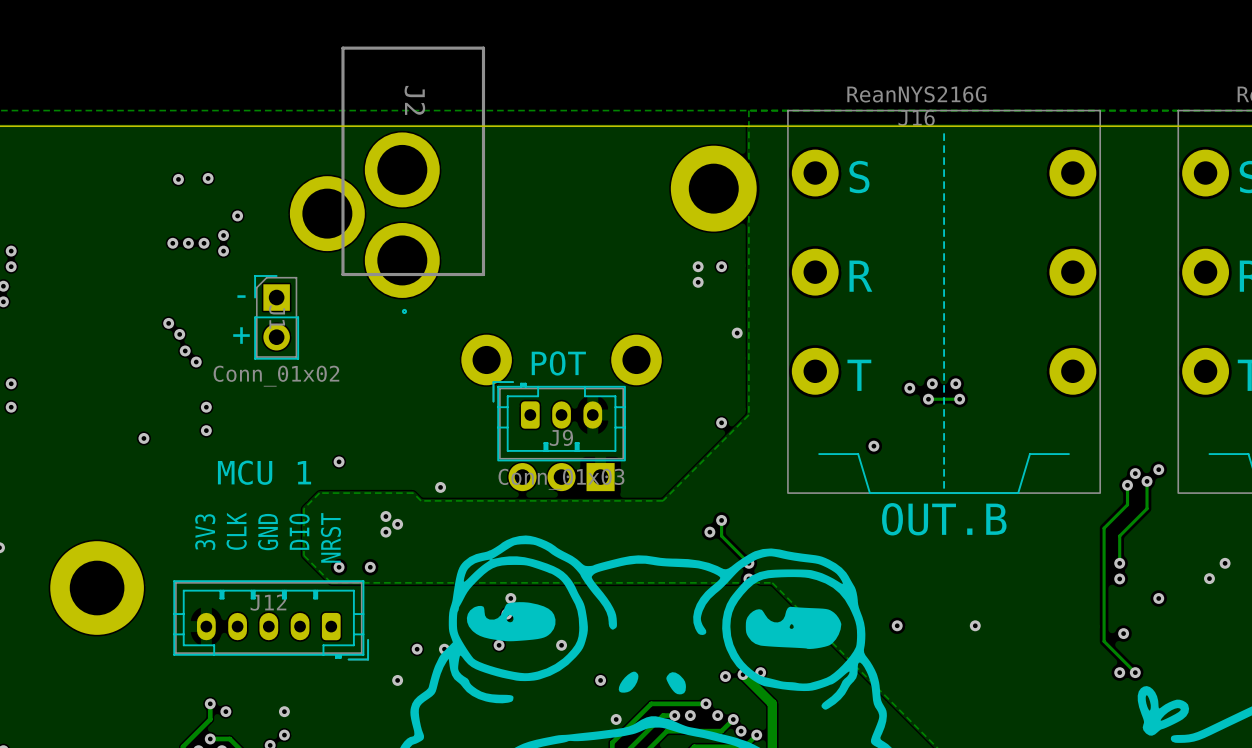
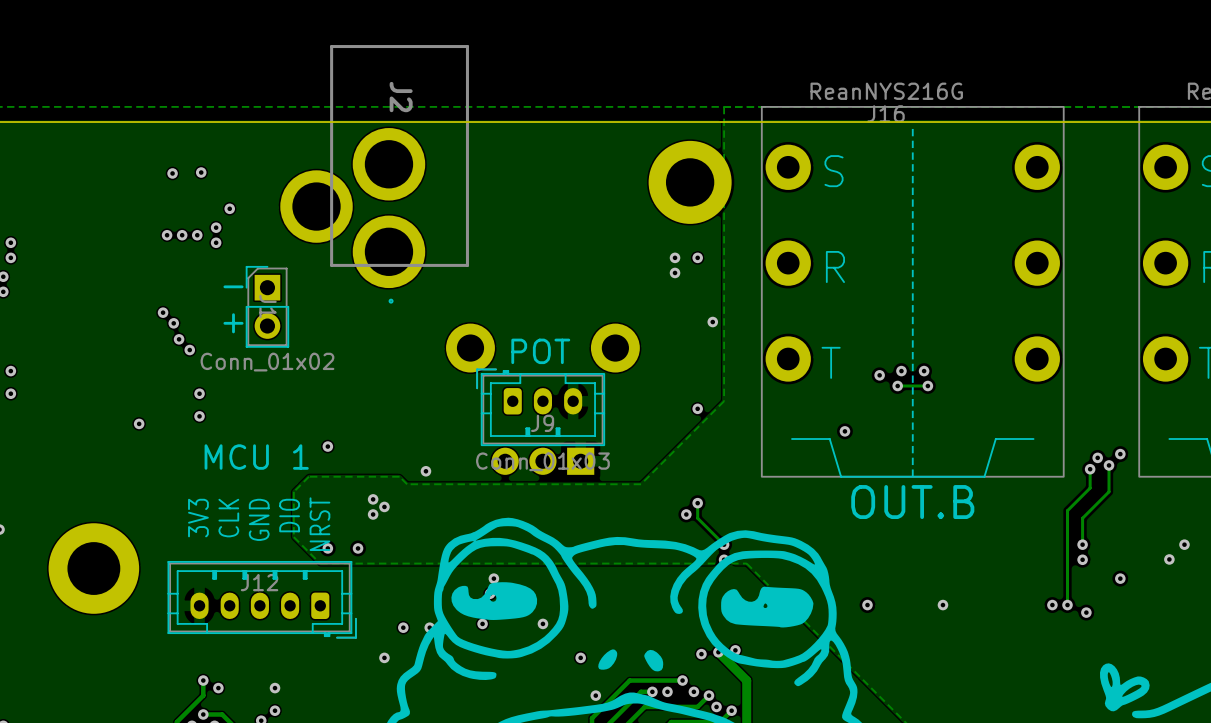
via: none -> (1052, 605)
track: (1104, 625) (1104, 641) (1135, 672) -> none
via: none -> (1067, 605)
via: (1119, 672) -> none
via: (1135, 672) -> none

